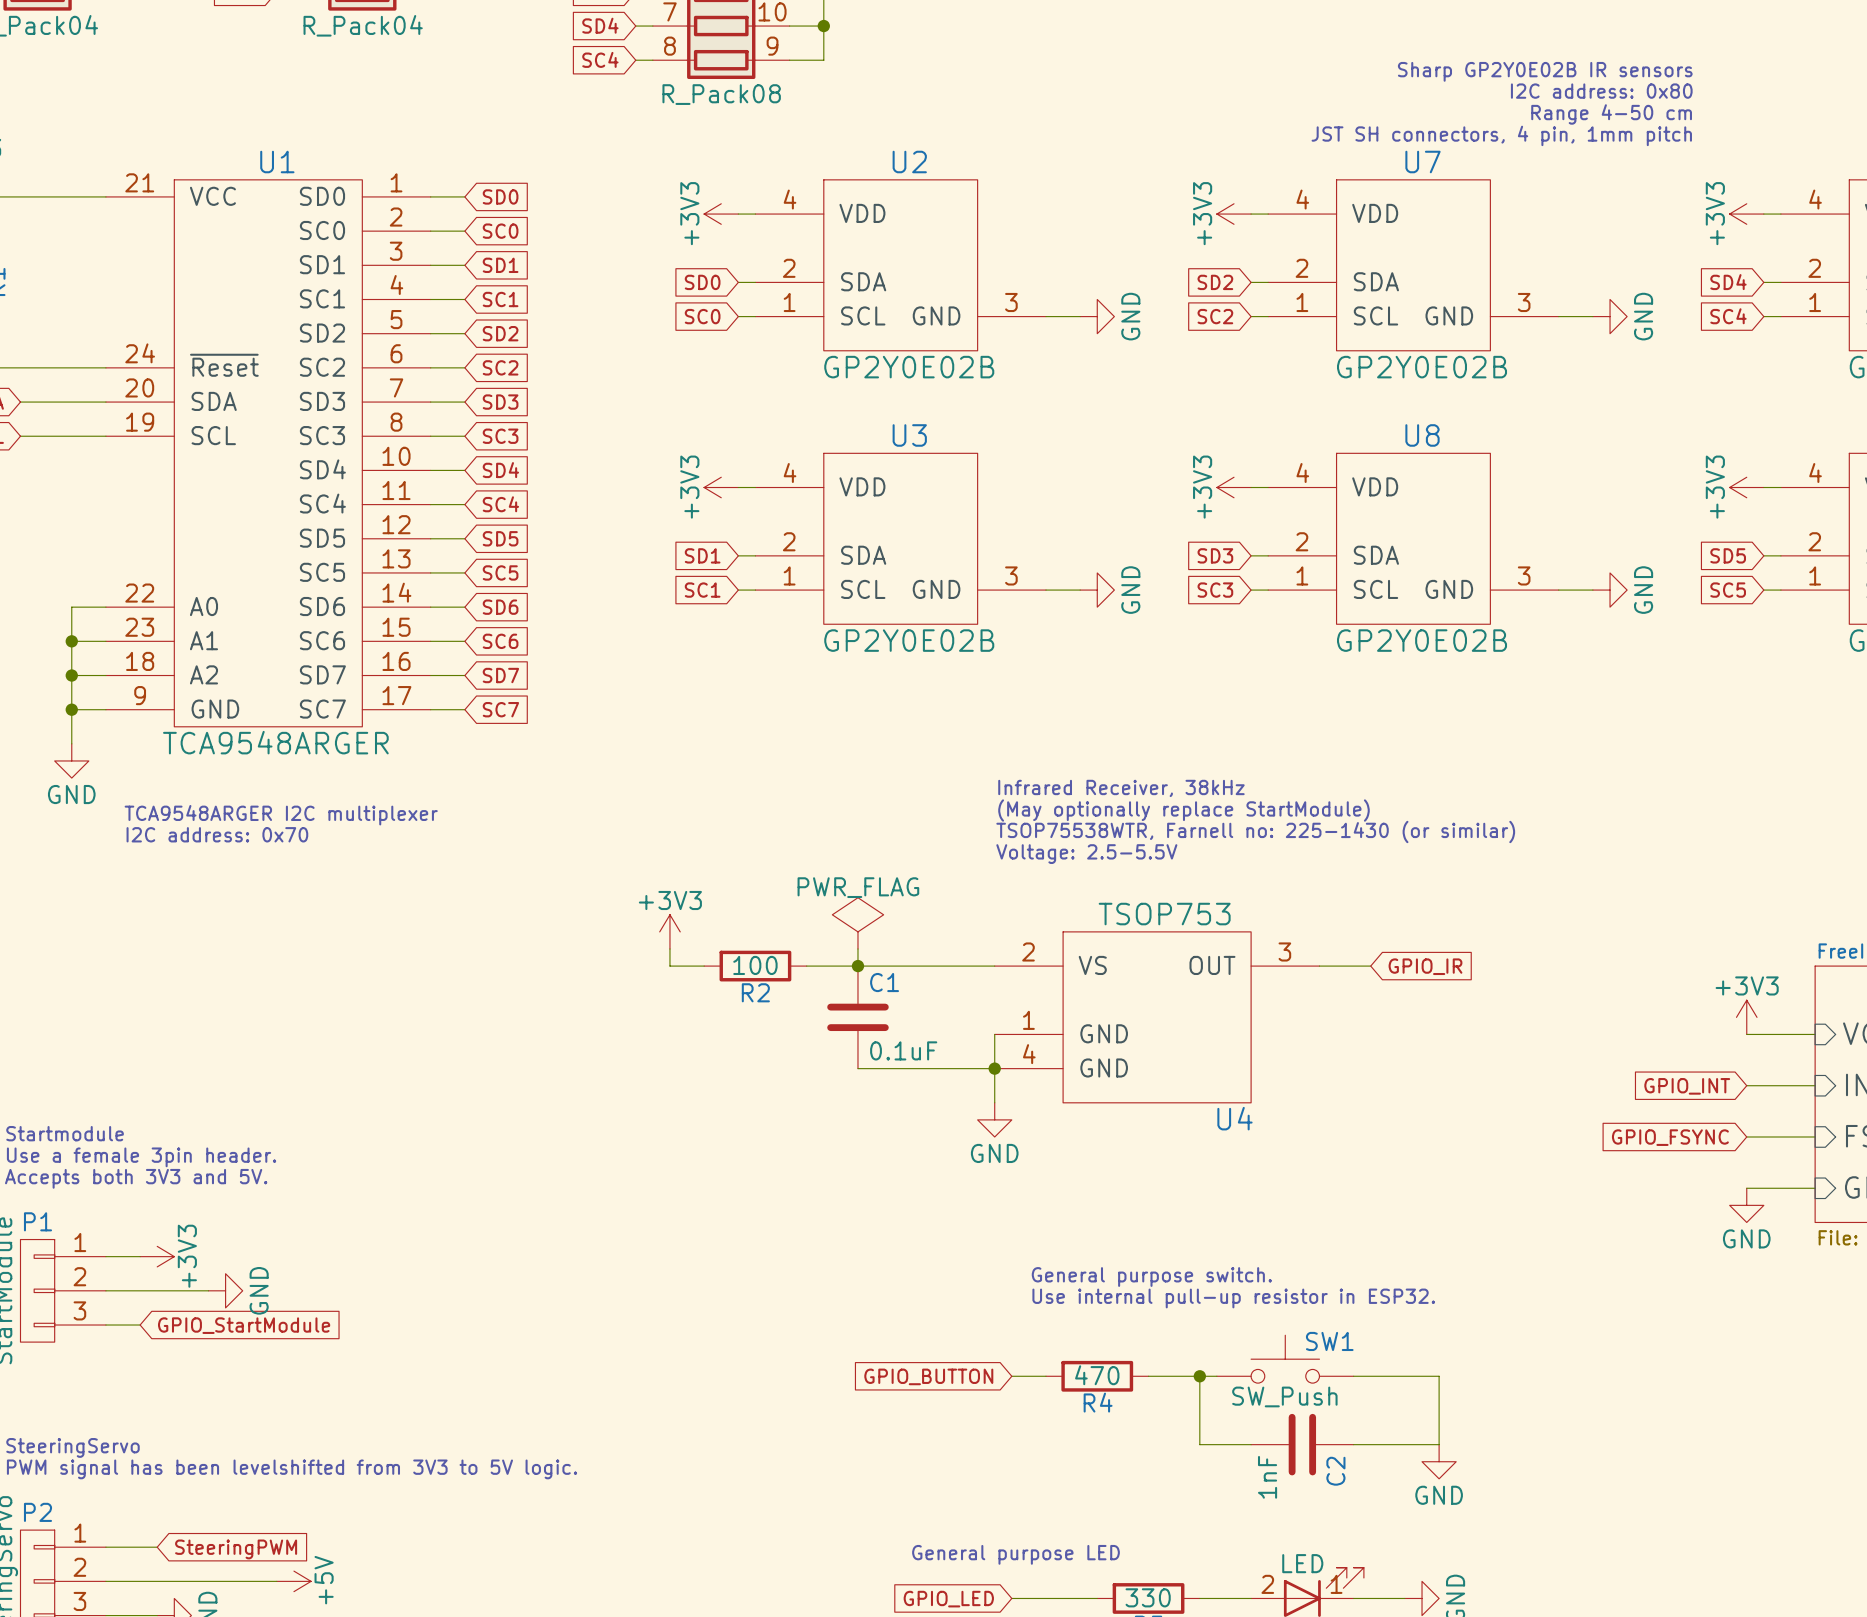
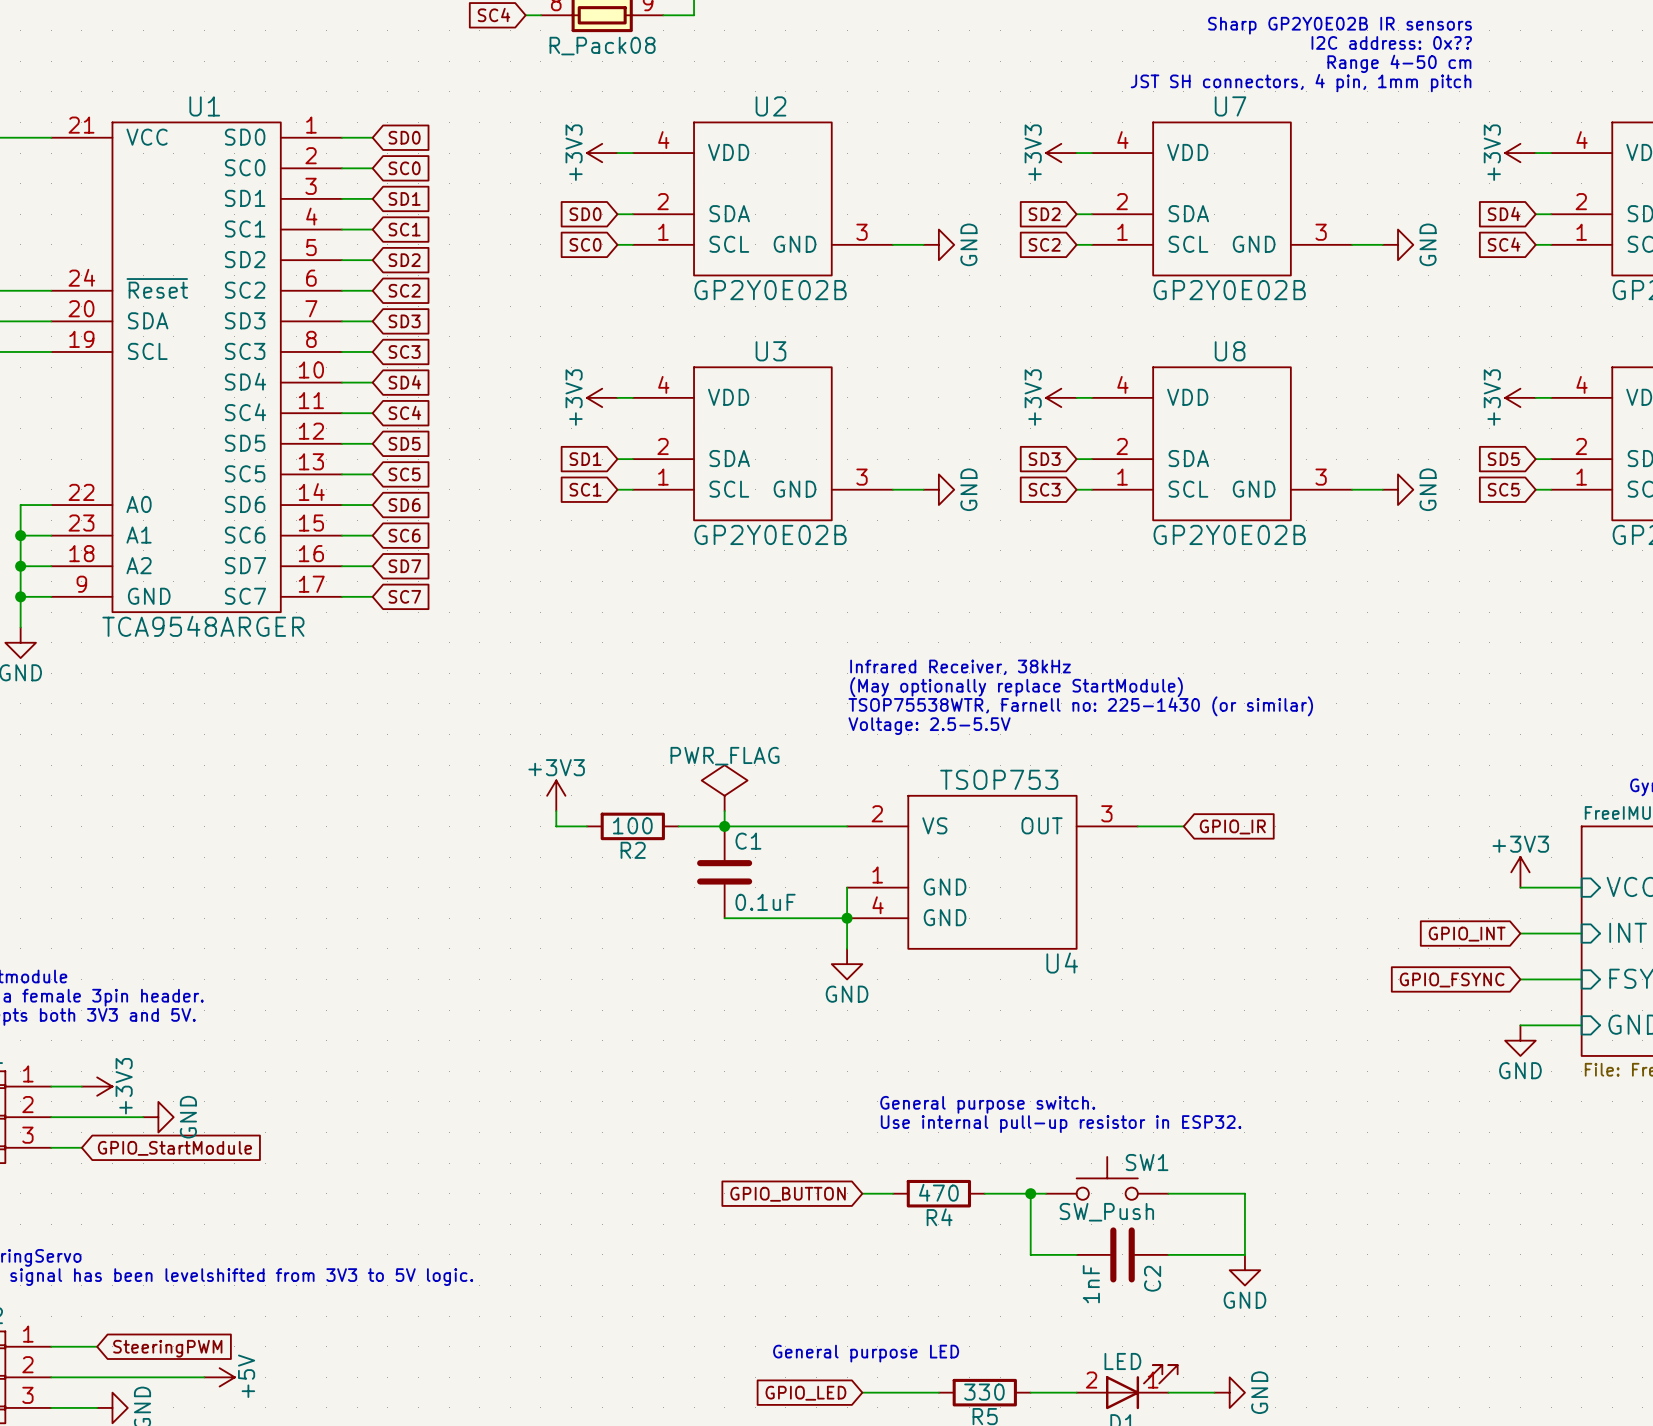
text: I2C address: 0x80 (1601, 91) -> I2C address: 0x?? (1391, 42)
text: TCA9548ARGER I2C multiplexer (281, 815) -> none
text: I2C address: 0x70 (217, 834) -> none

